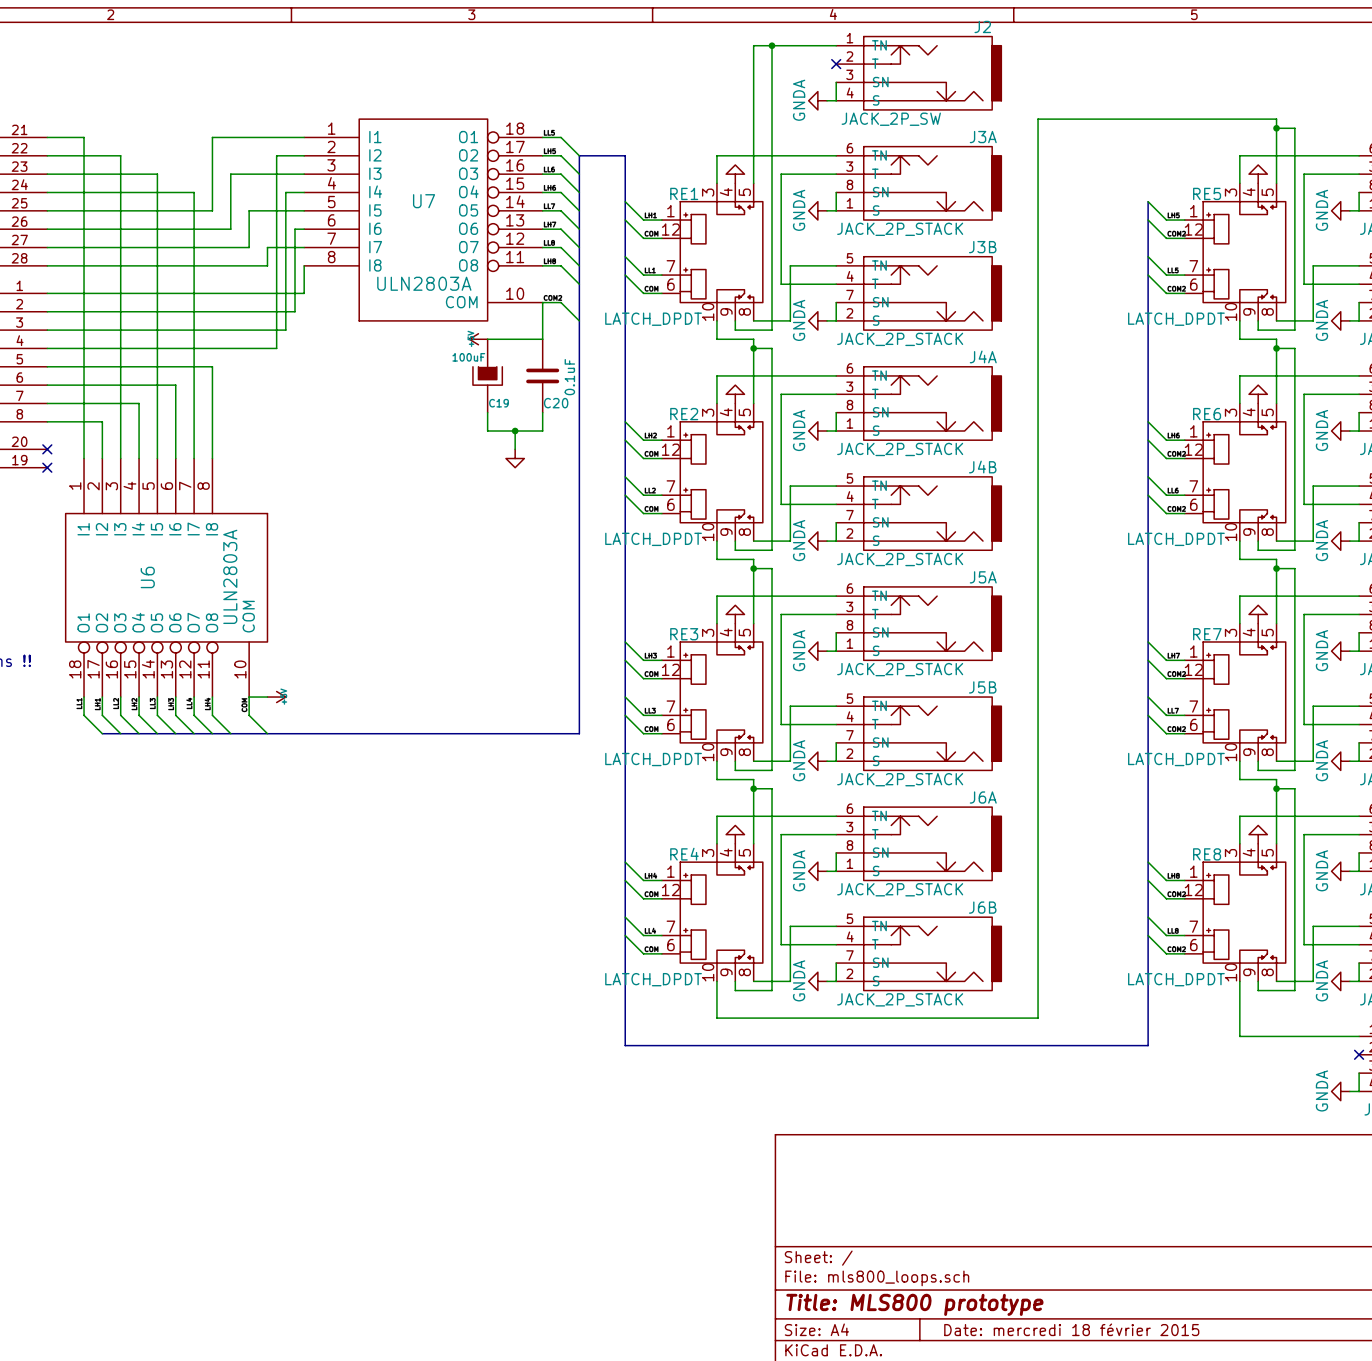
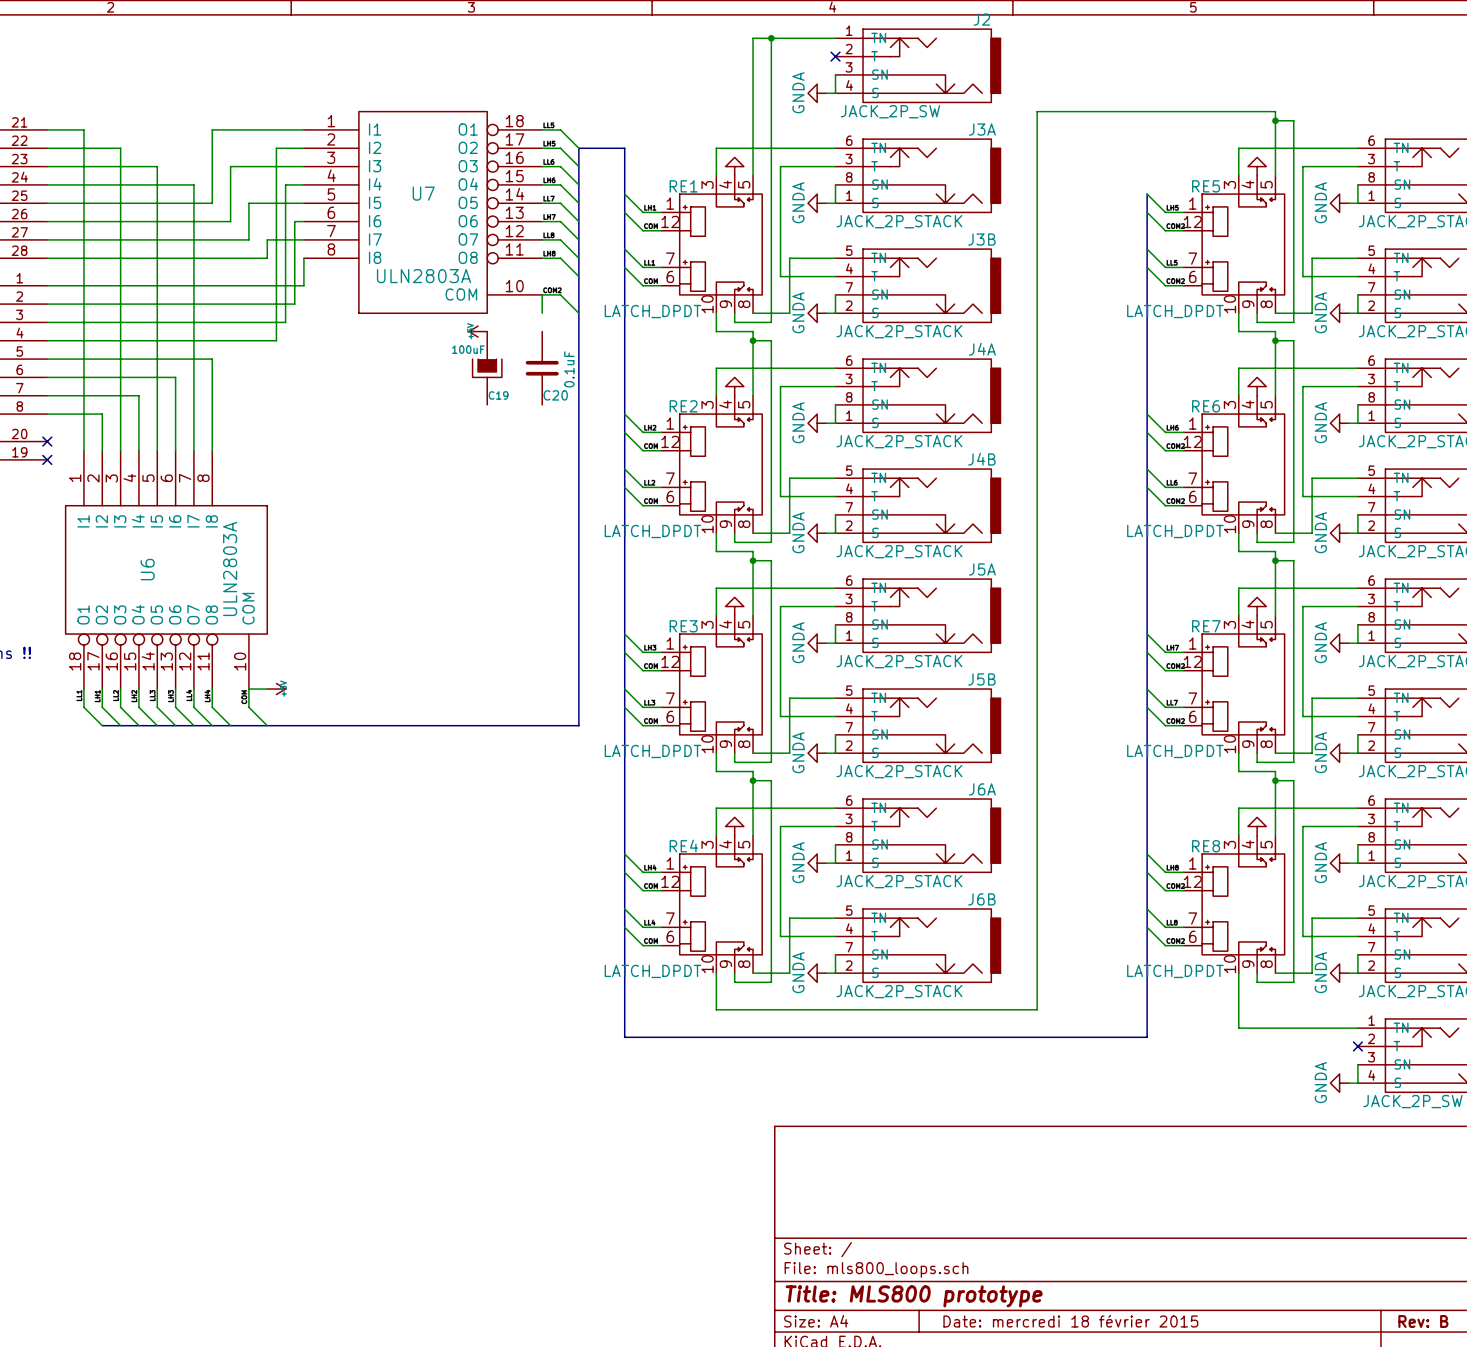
wire: (542, 320) (542, 339) (487, 339) -> none
wire: (487, 412) (487, 431) (542, 431) (542, 412) -> none
wire: (515, 431) (515, 449) -> none
junction: (515, 431) -> none
power symbol: (515, 458) -> none

